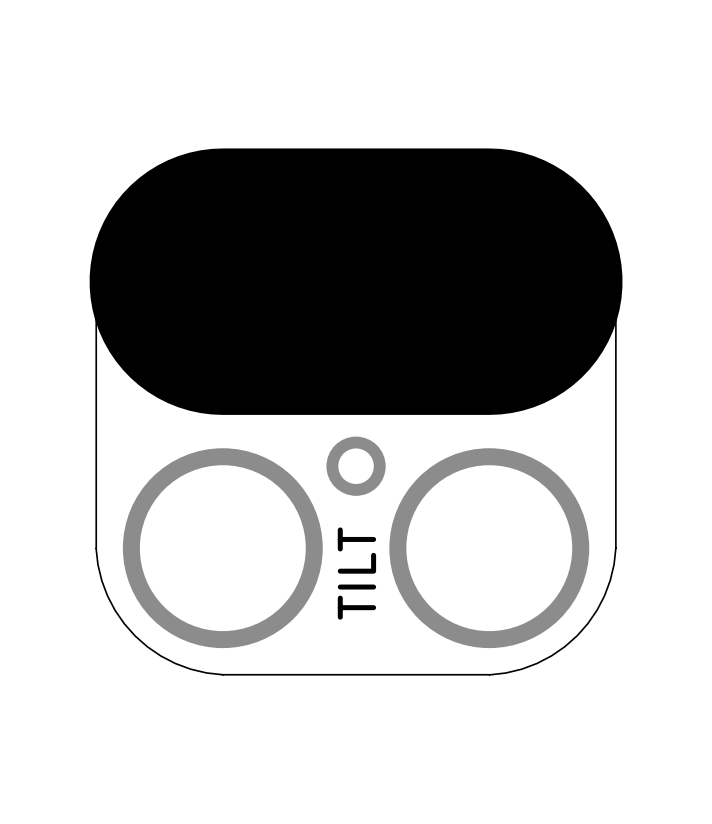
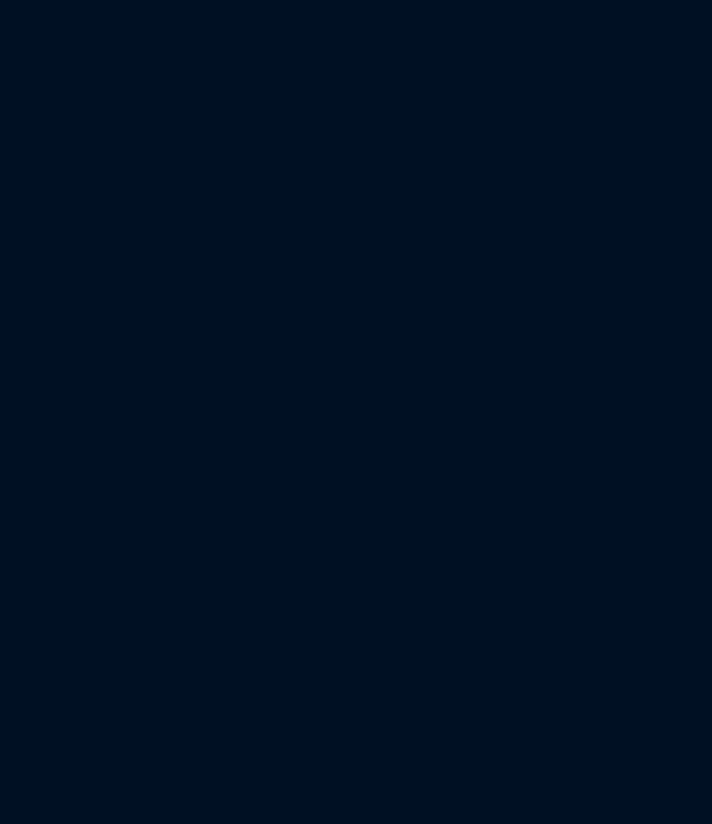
part: (356, 412) -> none

